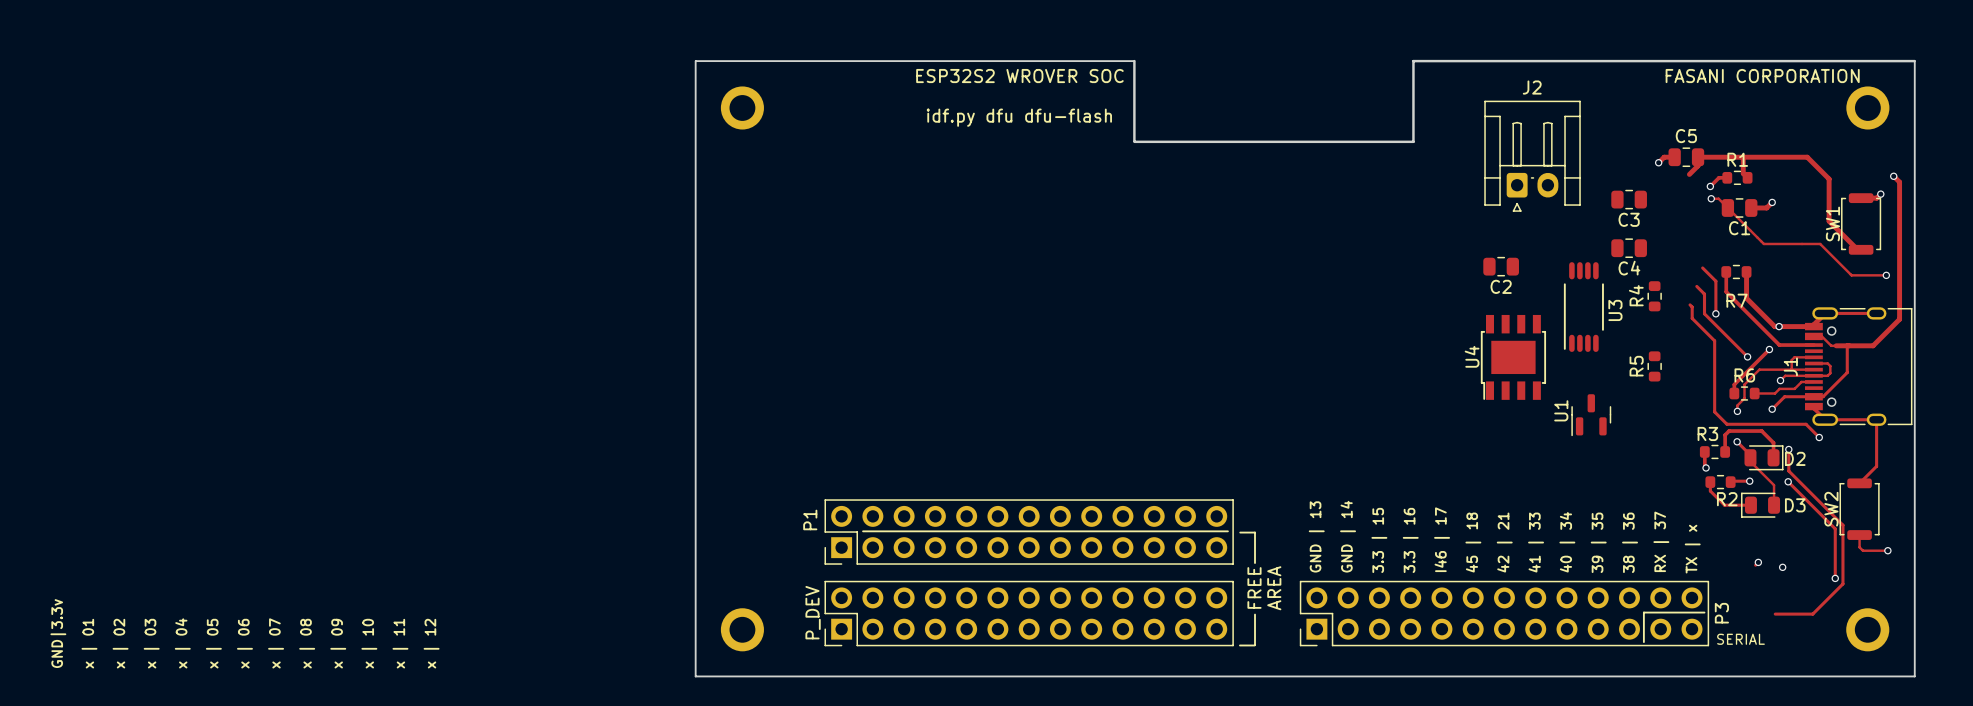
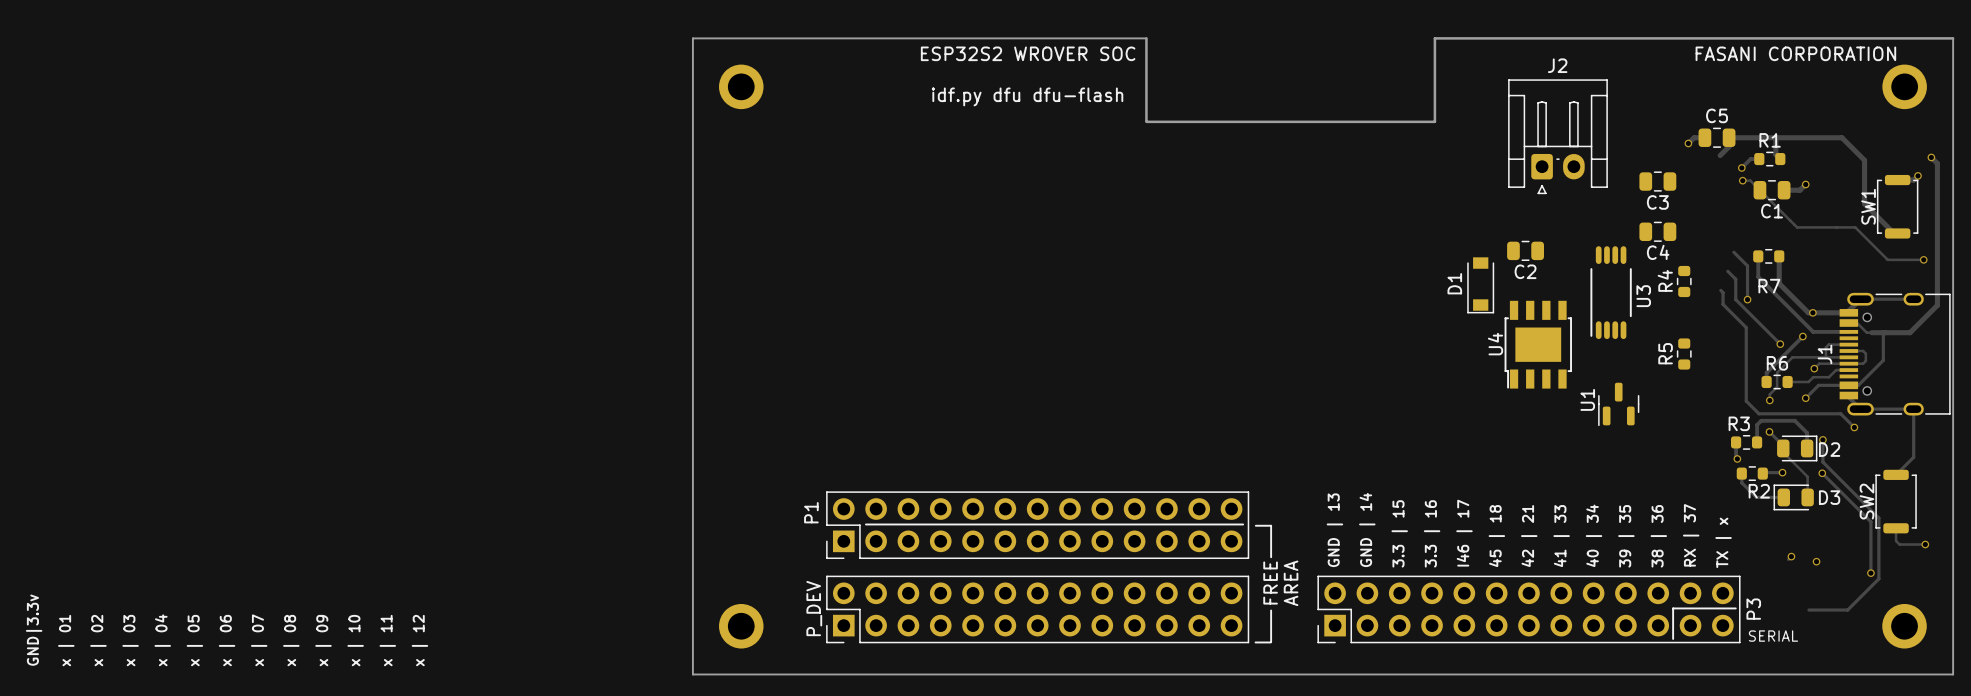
D1: none -> (1480, 285)

